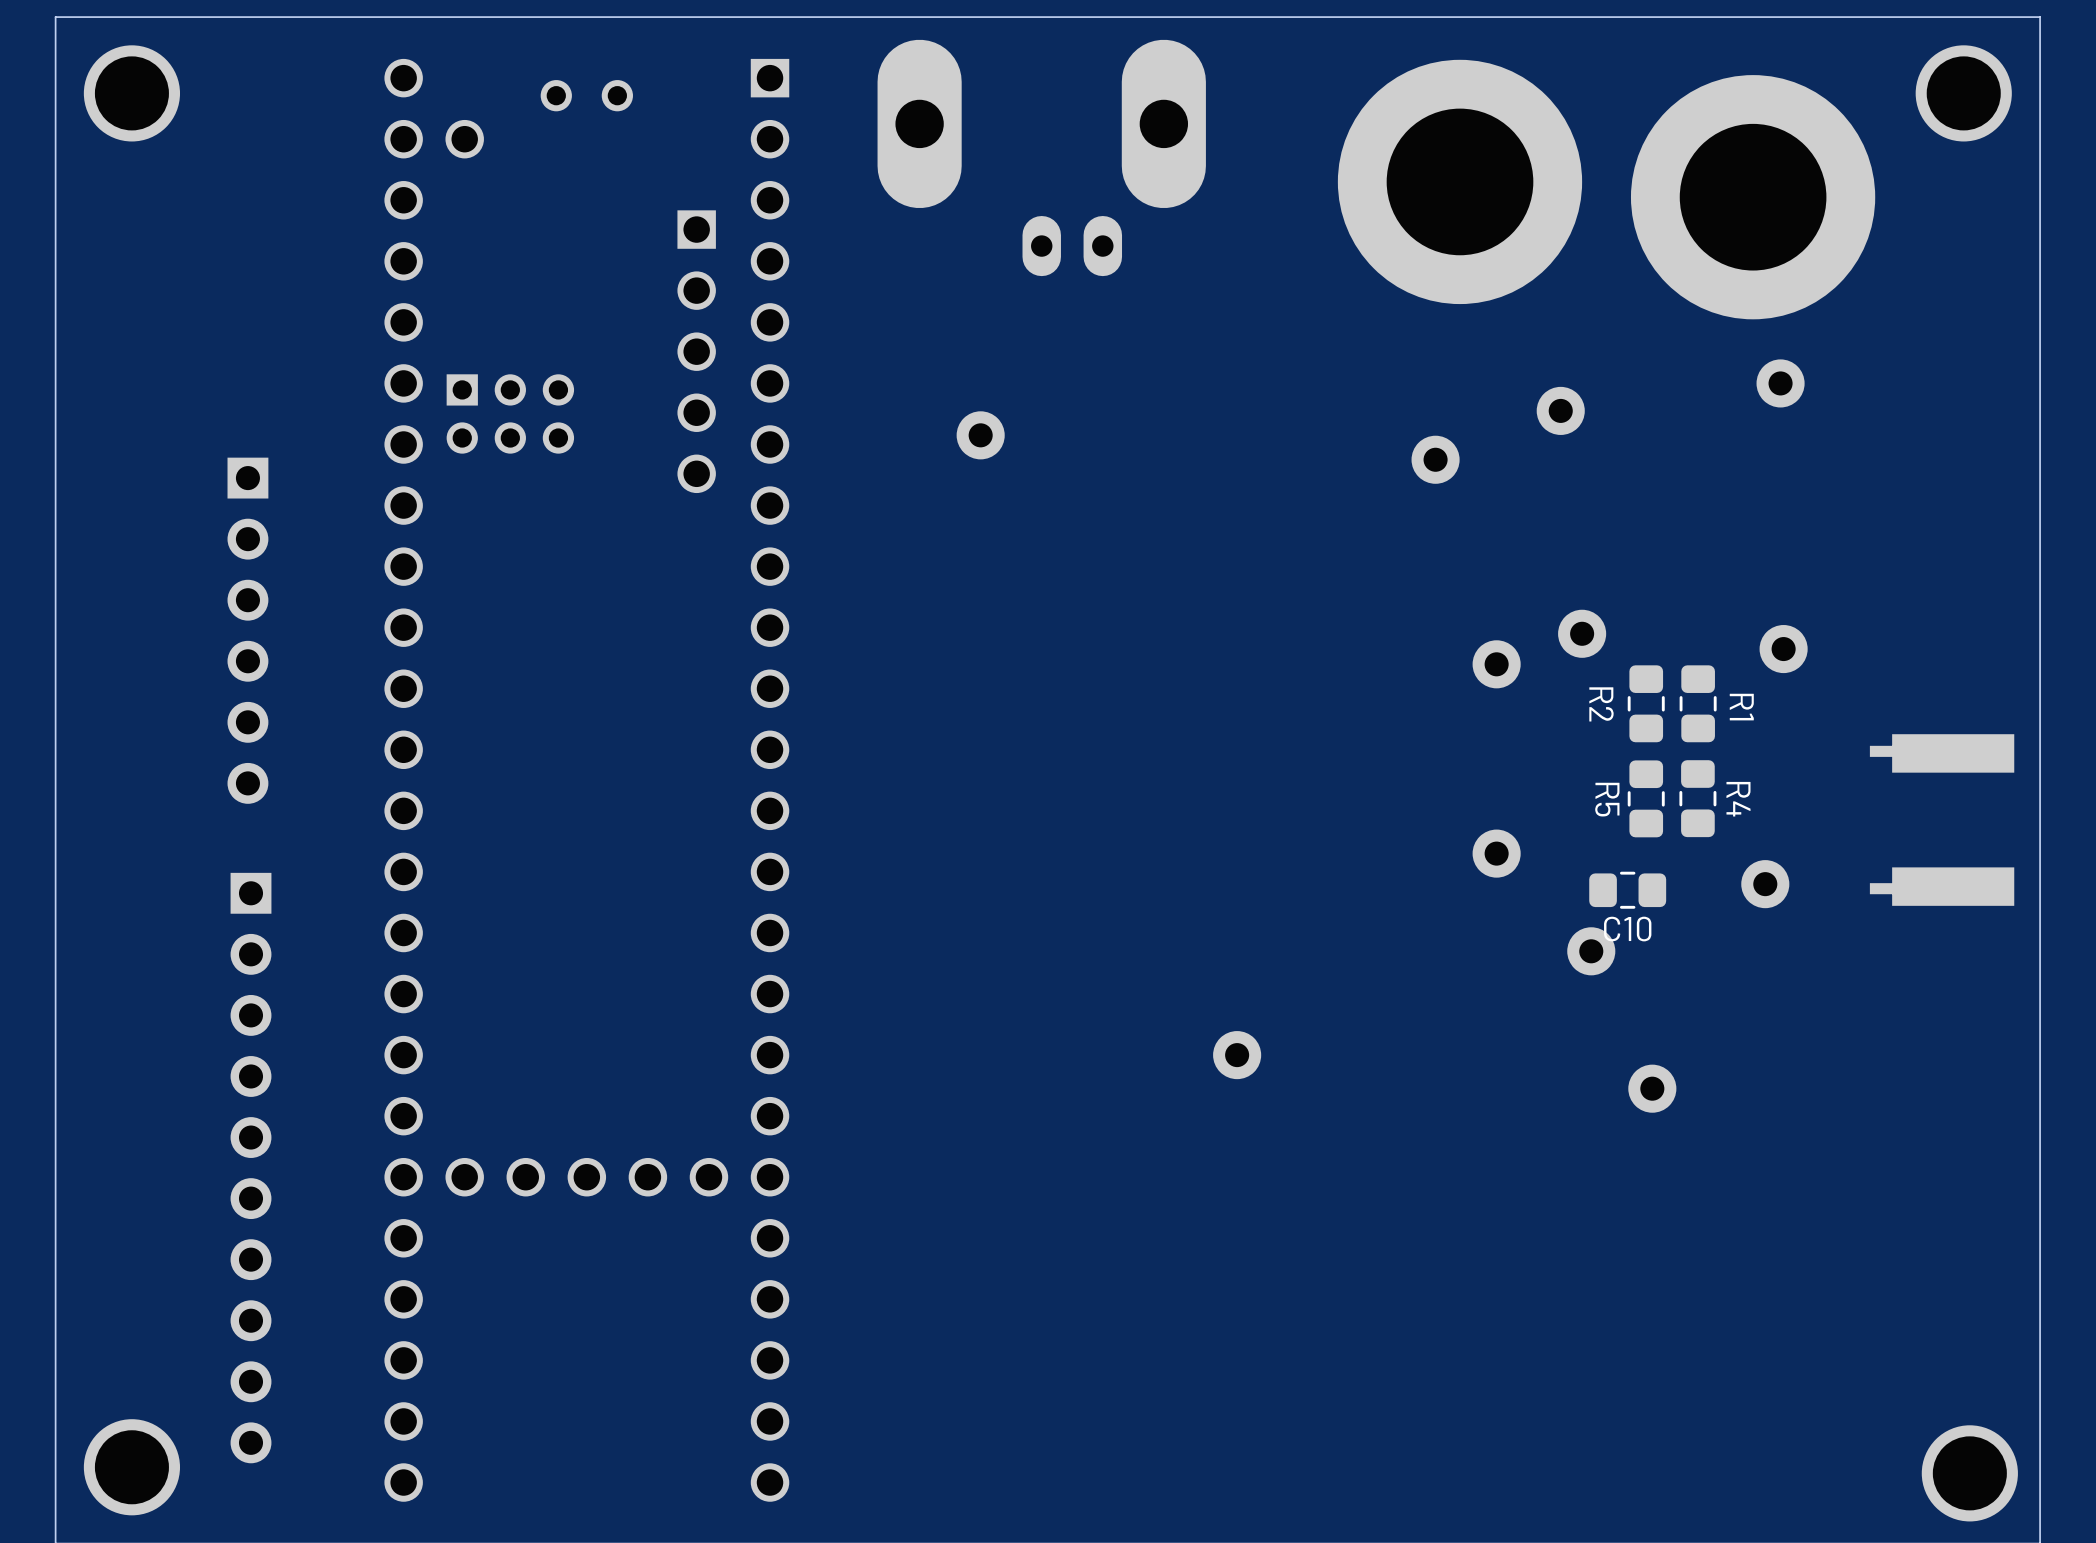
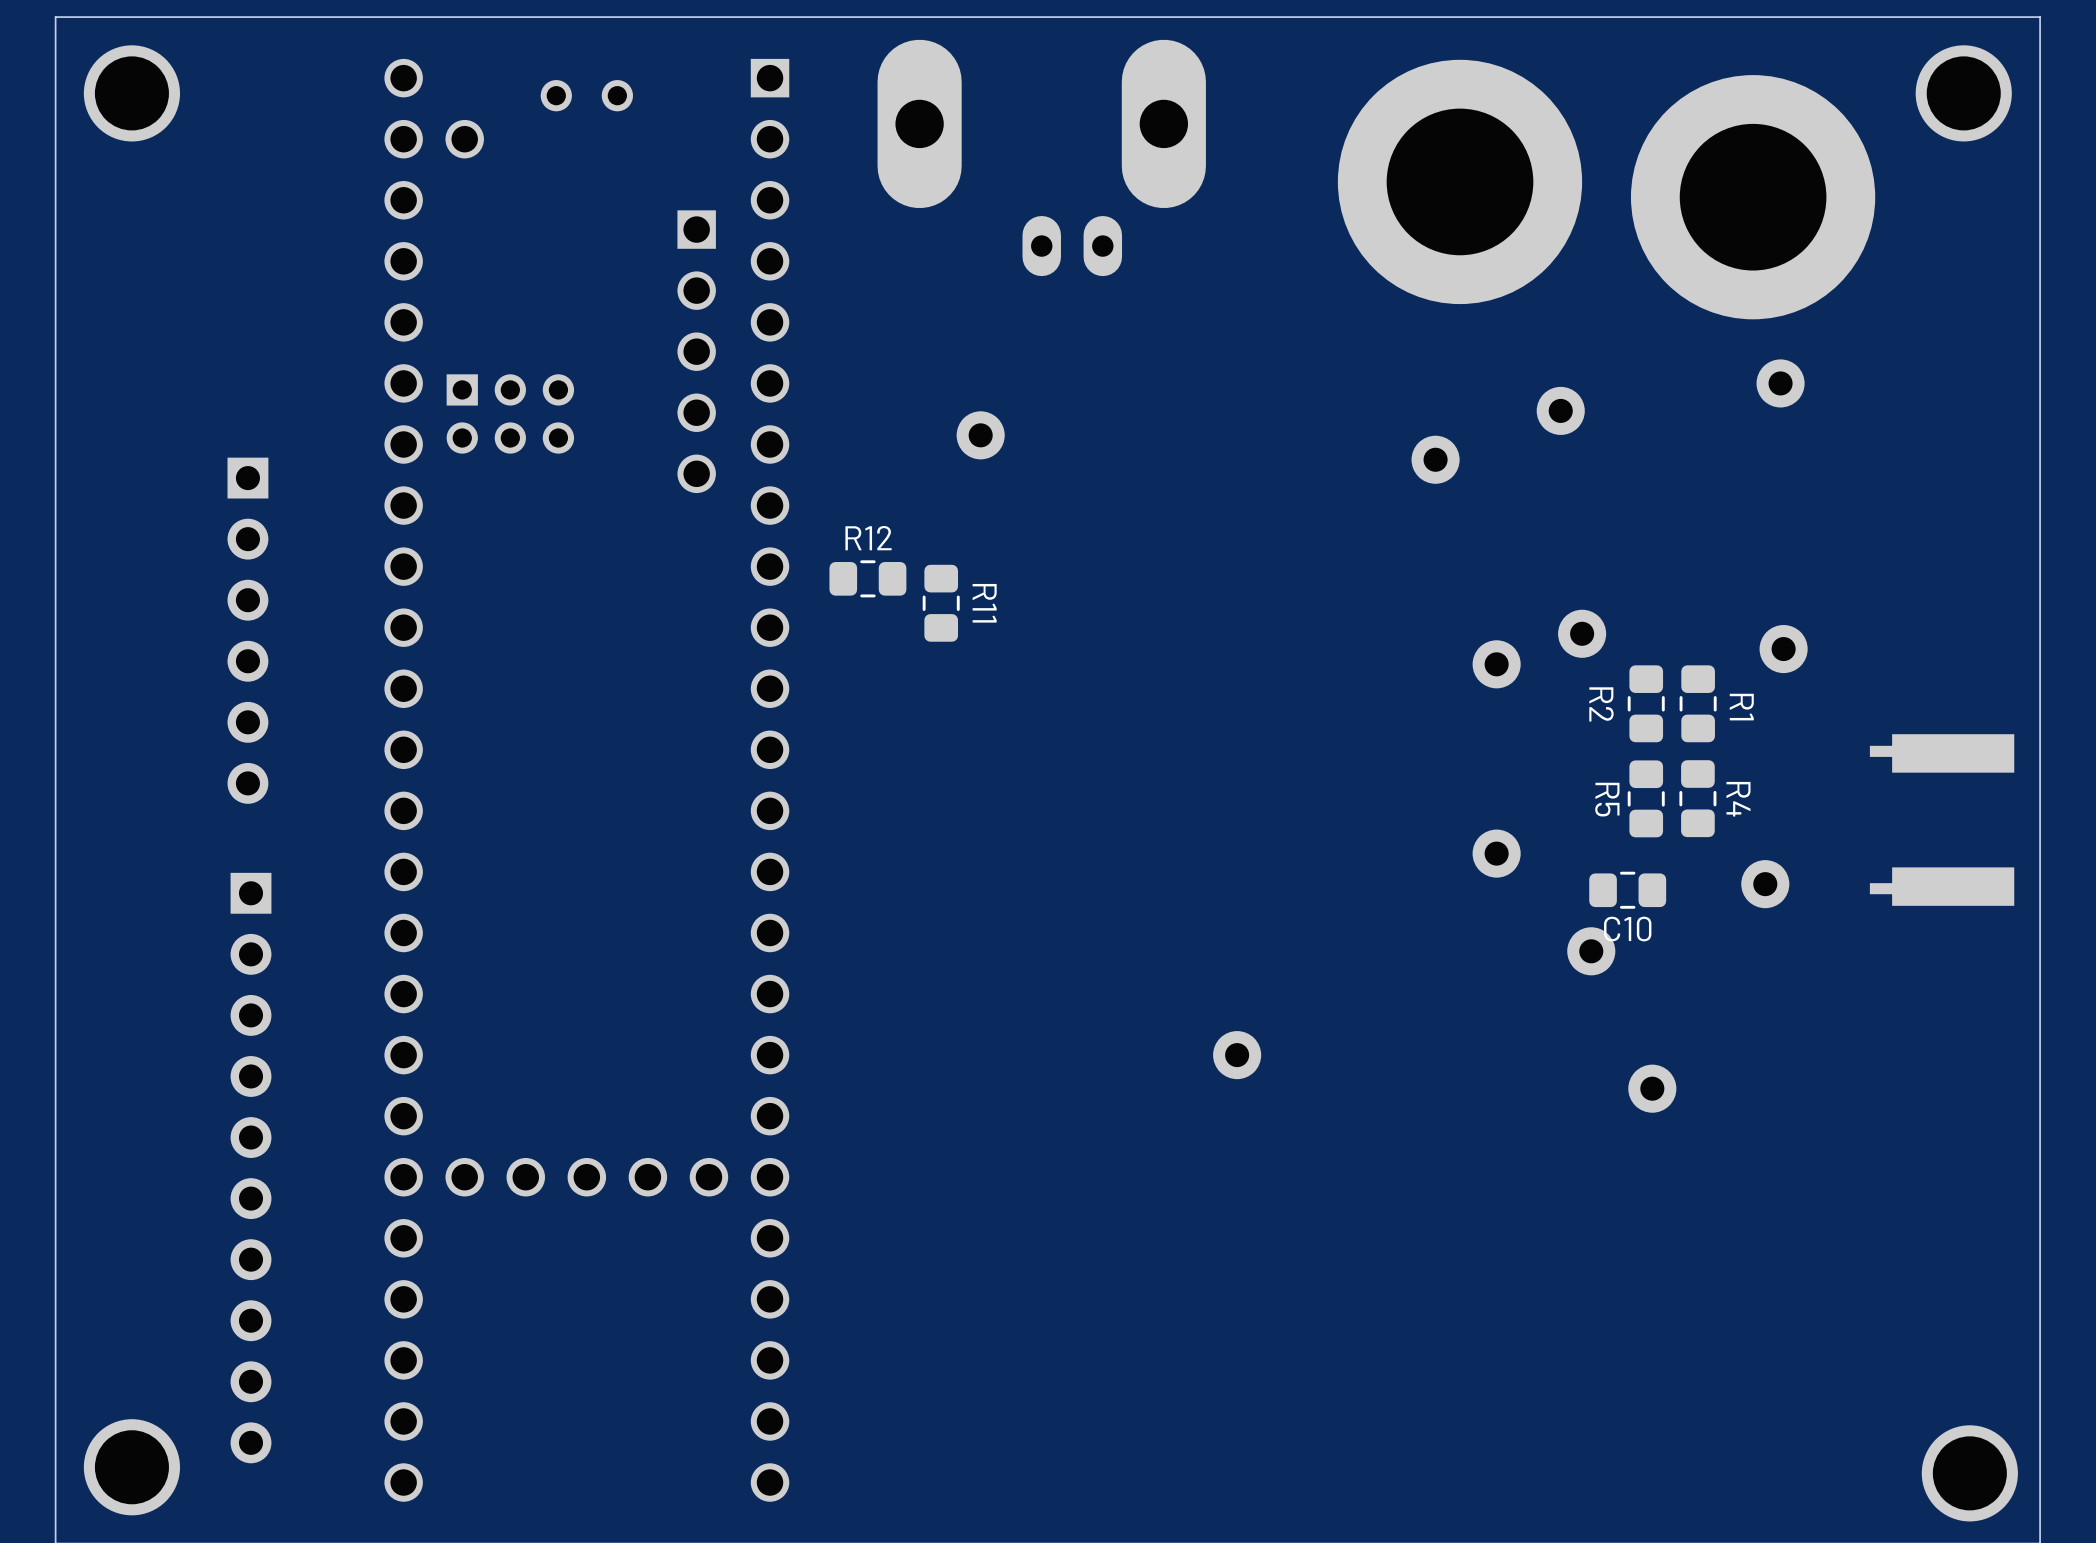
R12: none -> (867, 578)
R11: none -> (941, 603)

